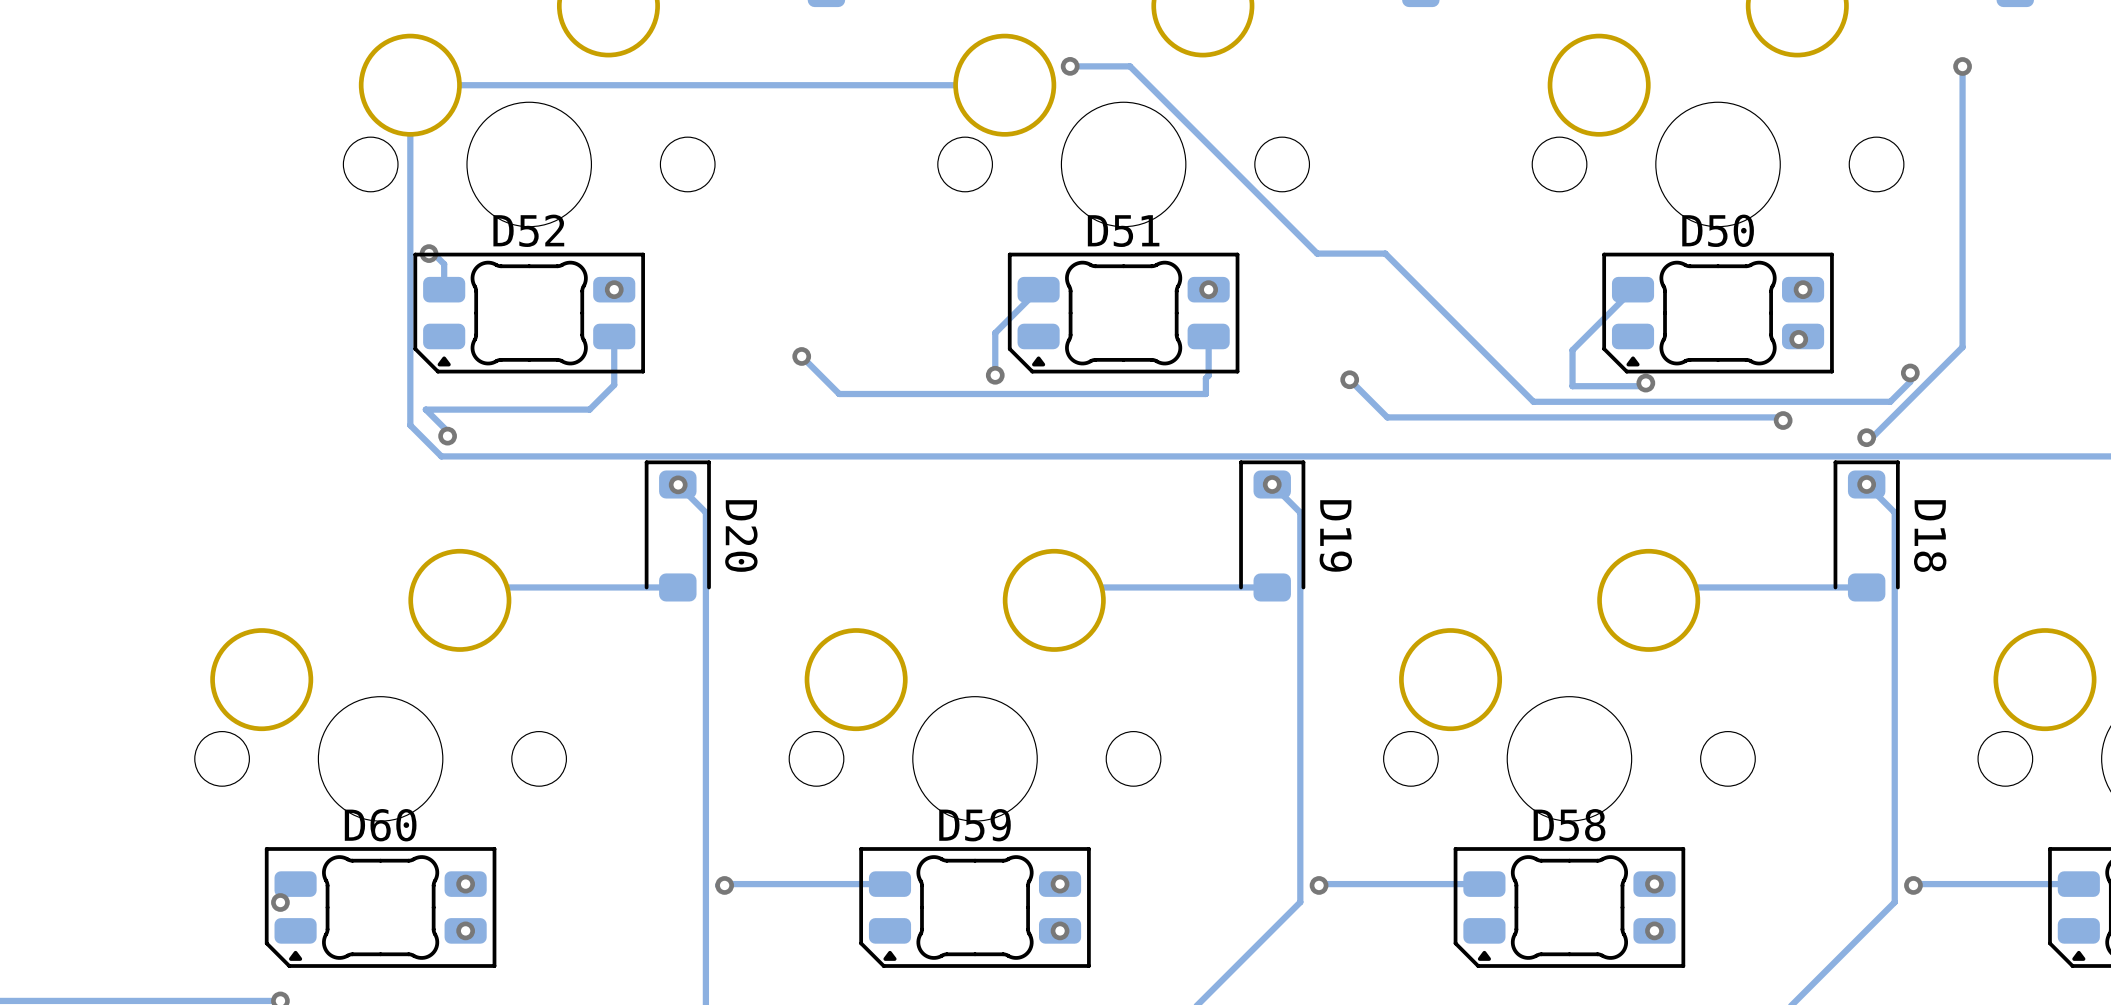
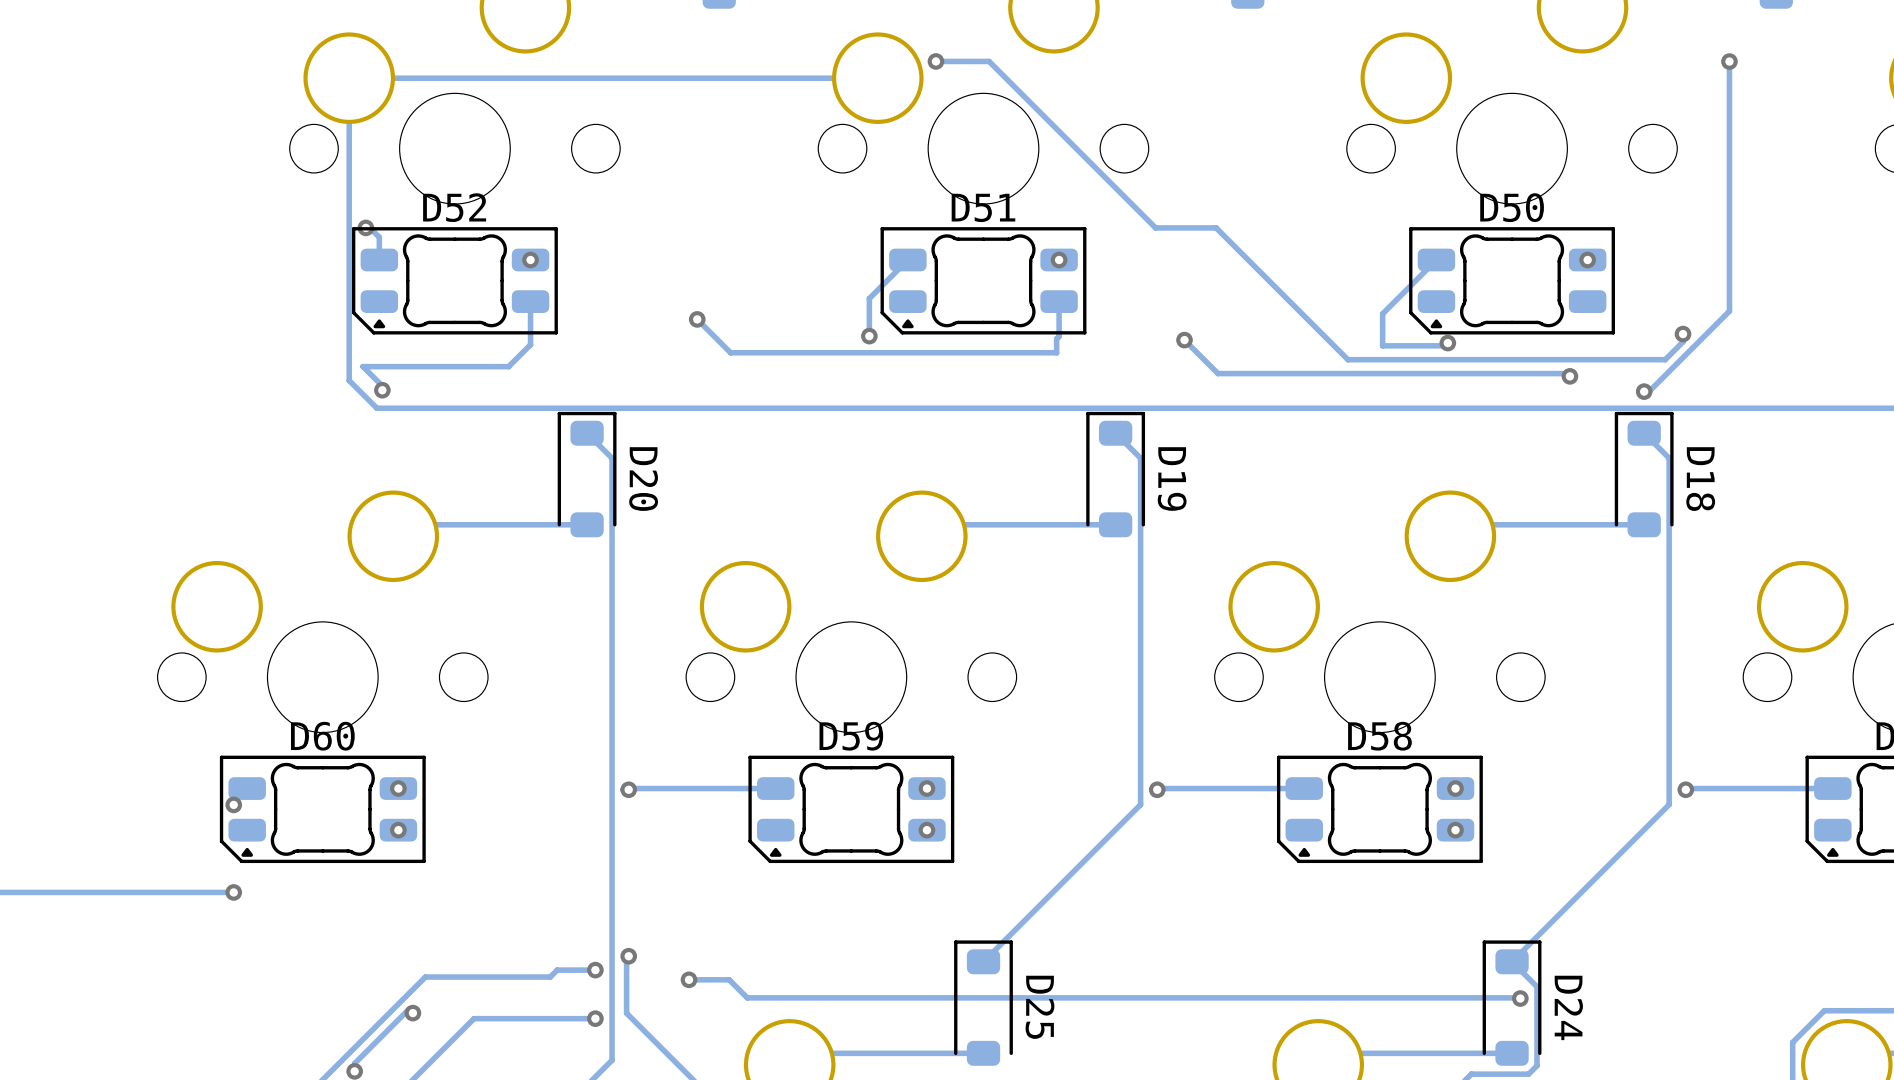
via: (1798, 339) -> none
via: (678, 484) -> none
via: (1272, 484) -> none
via: (1866, 484) -> none

